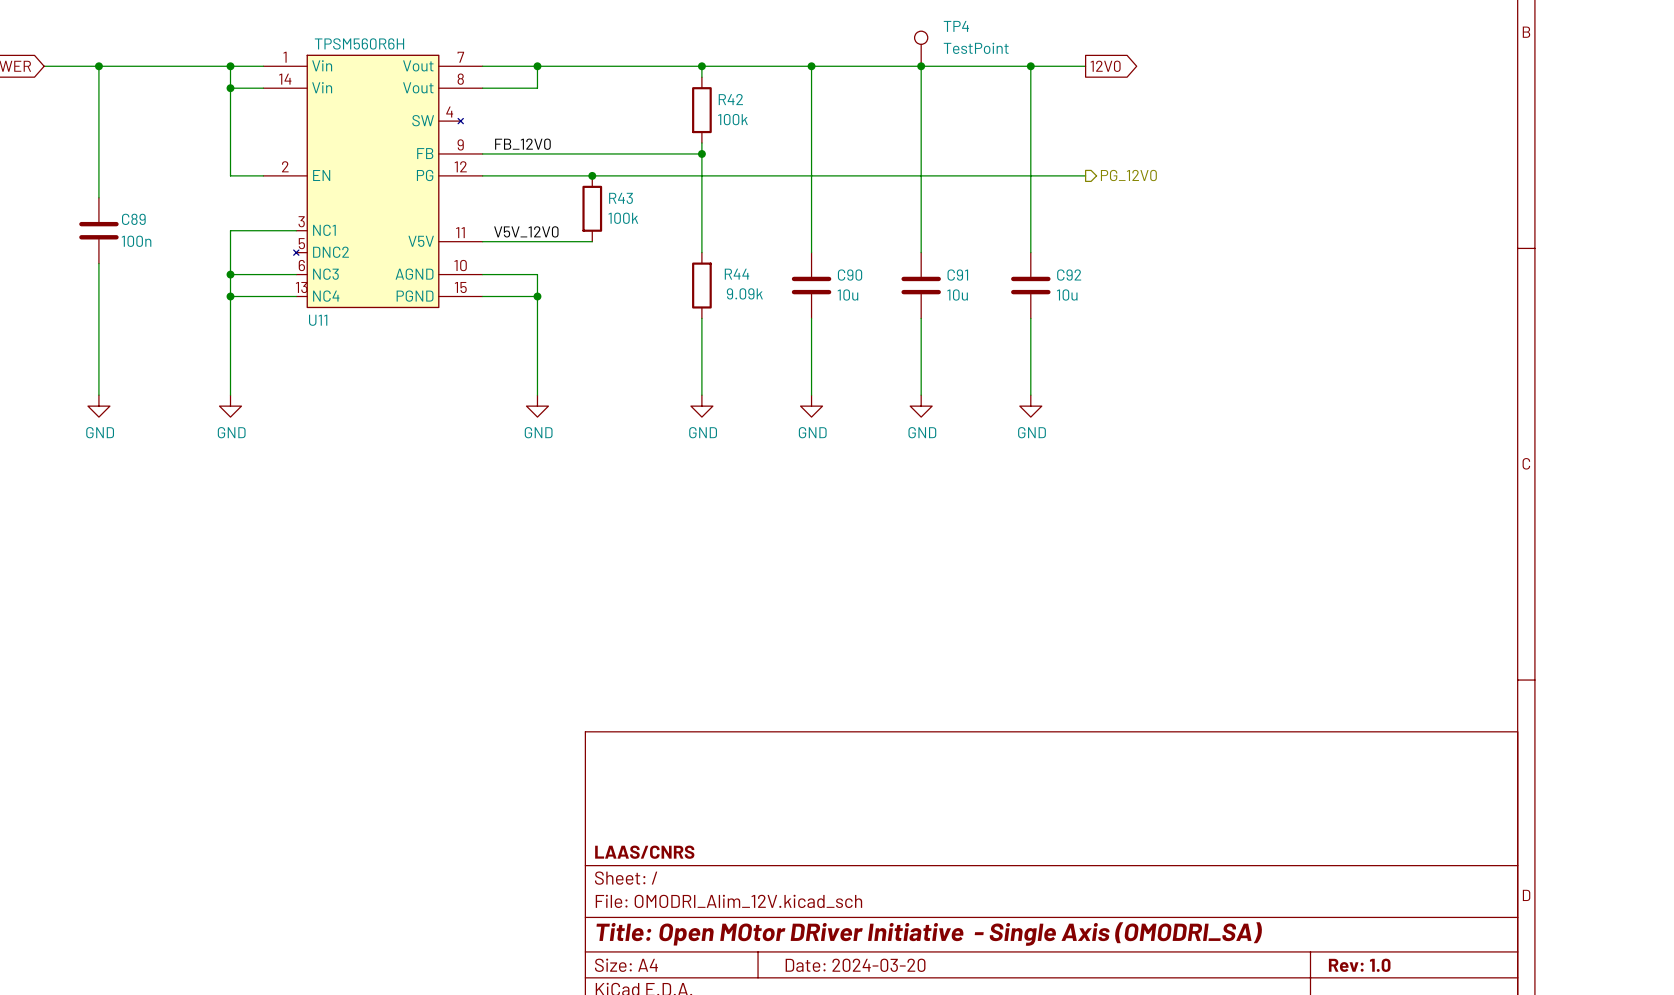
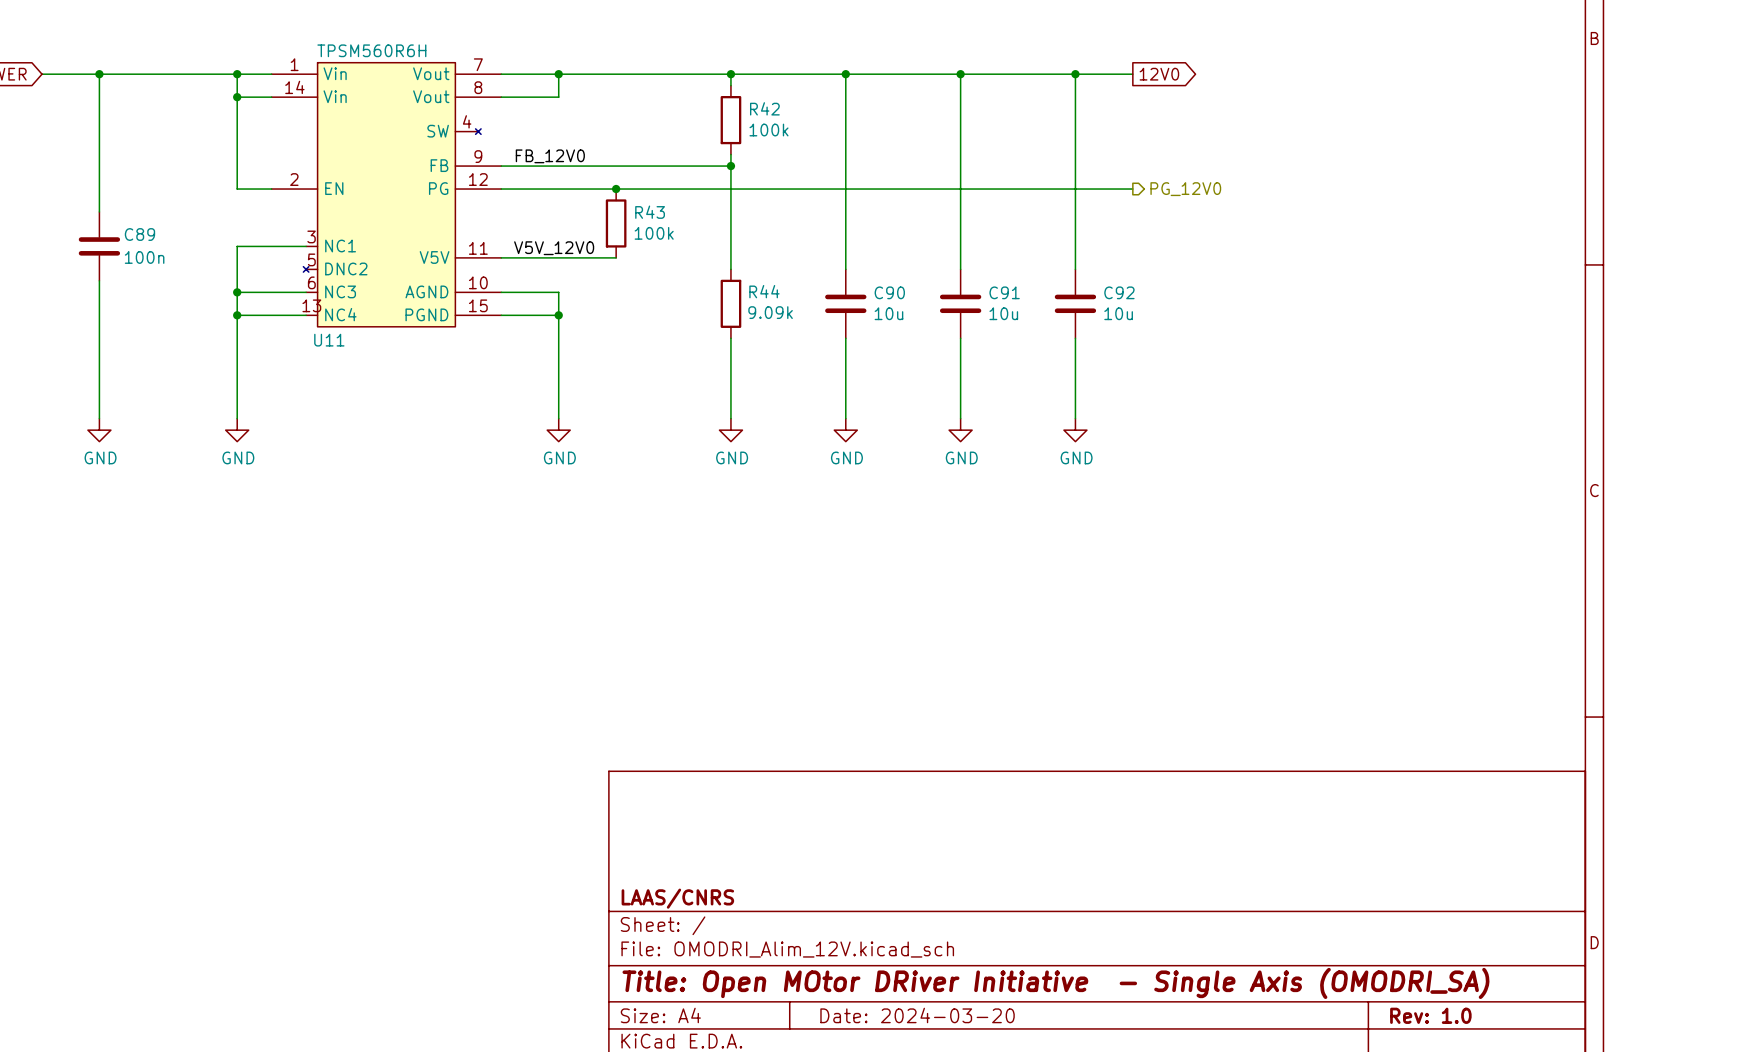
TP4: TestPoint (921, 48) -> none

